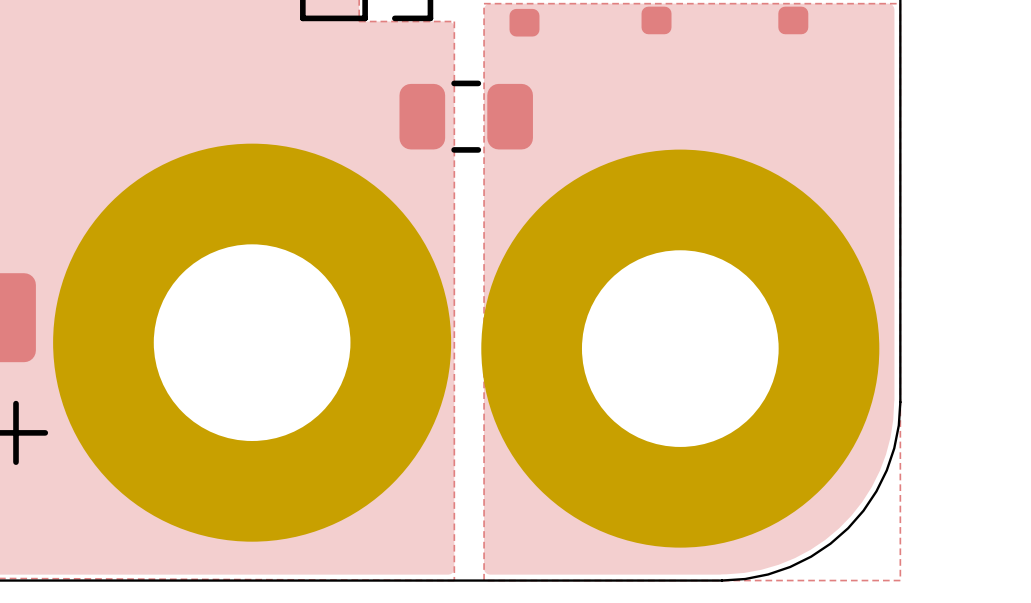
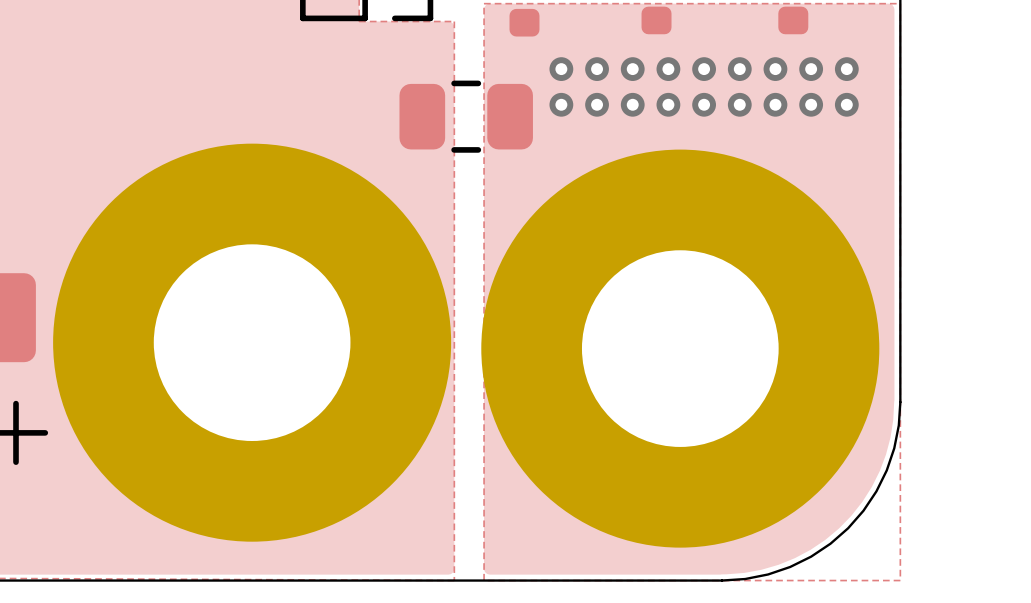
via: none -> (561, 69)
via: none -> (597, 69)
via: none -> (632, 69)
via: none -> (668, 69)
via: none -> (704, 69)
via: none -> (739, 69)
via: none -> (775, 69)
via: none -> (811, 69)
via: none -> (846, 69)
via: none -> (561, 104)
via: none -> (597, 104)
via: none -> (632, 104)
via: none -> (668, 104)
via: none -> (704, 104)
via: none -> (739, 104)
via: none -> (775, 104)
via: none -> (811, 104)
via: none -> (846, 104)

